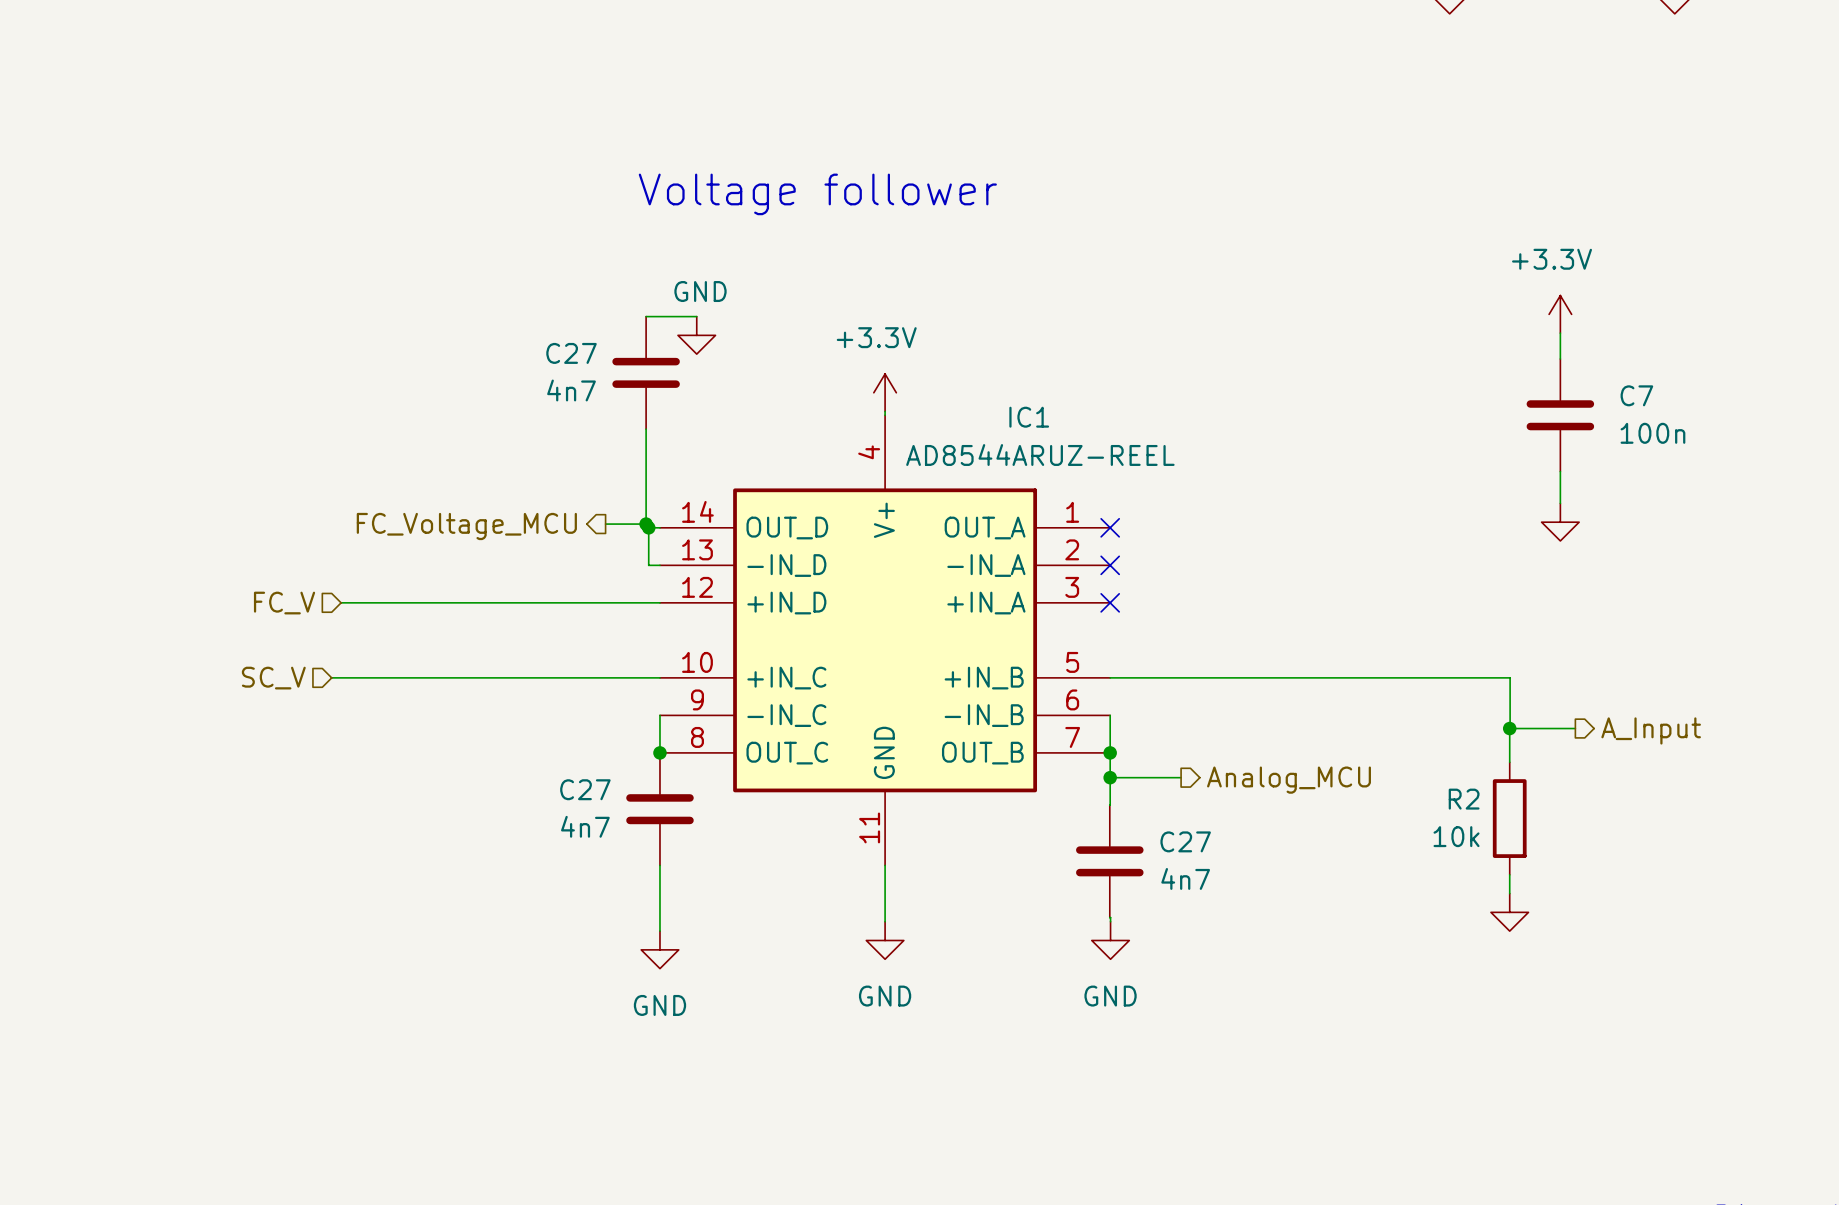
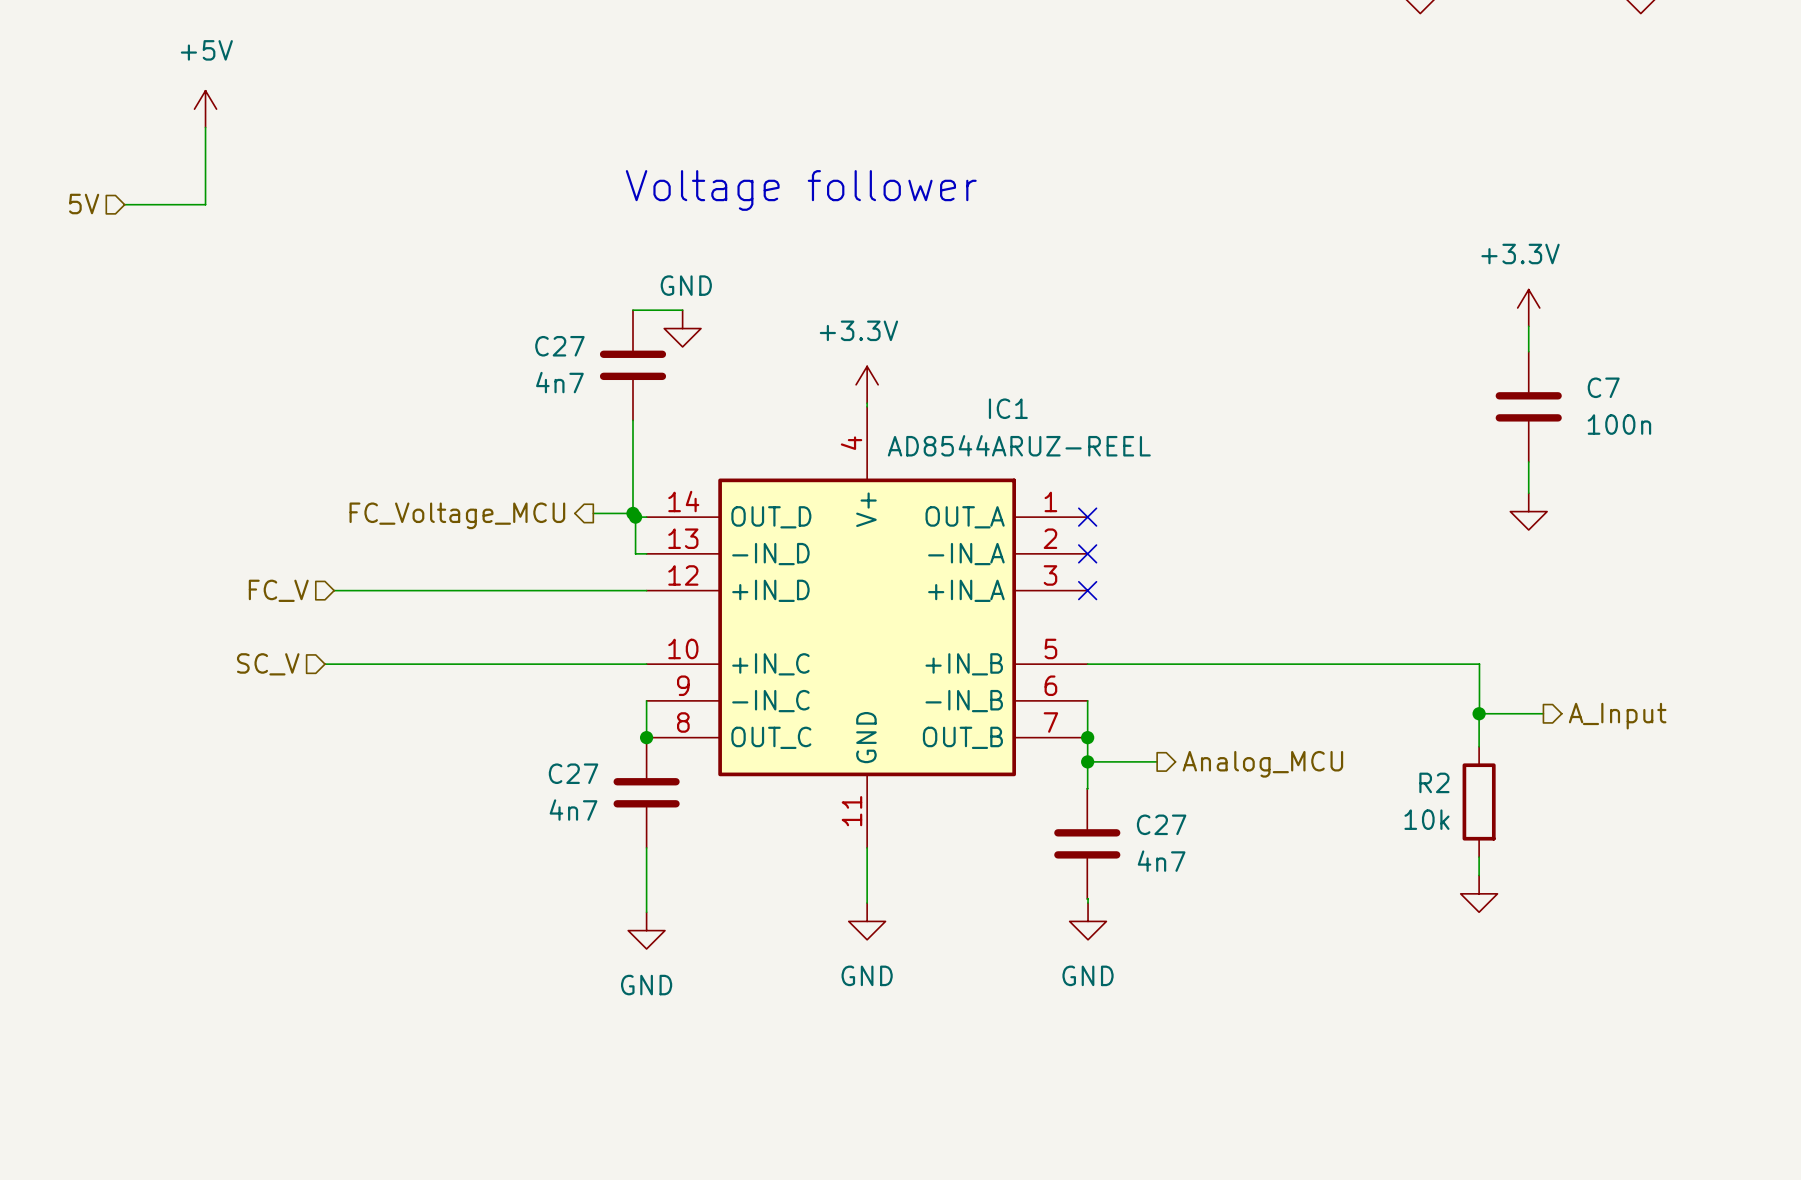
power symbol: none -> +5V (205, 109)
wire: none -> (205, 127) (205, 204) (124, 204)
hierarchical label: none -> 5V (84, 204)

